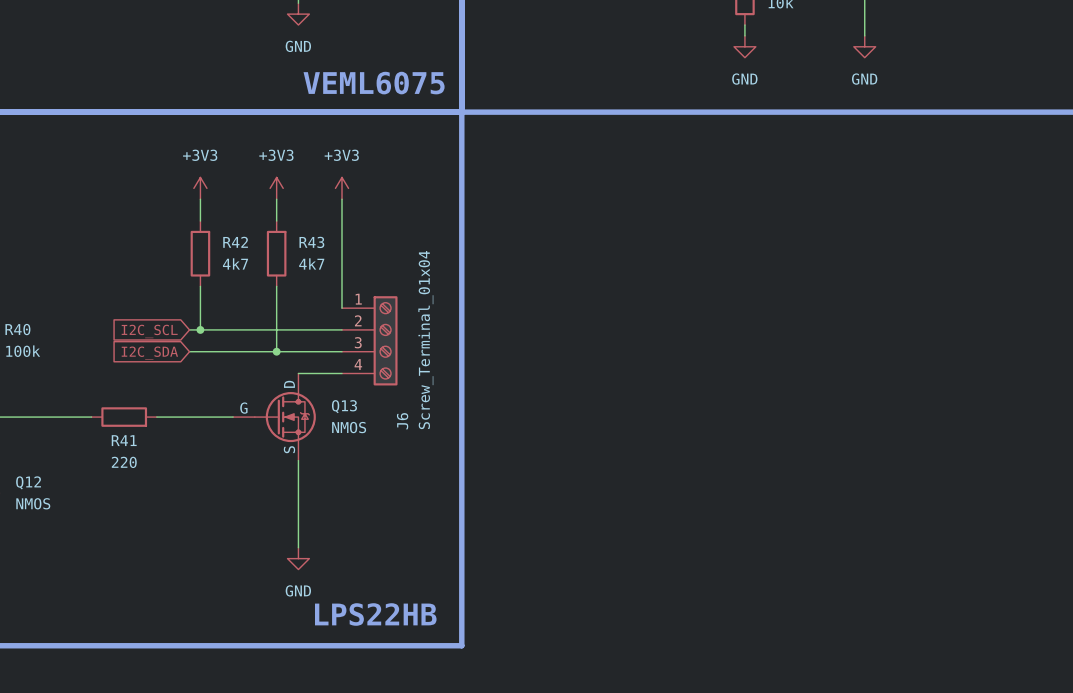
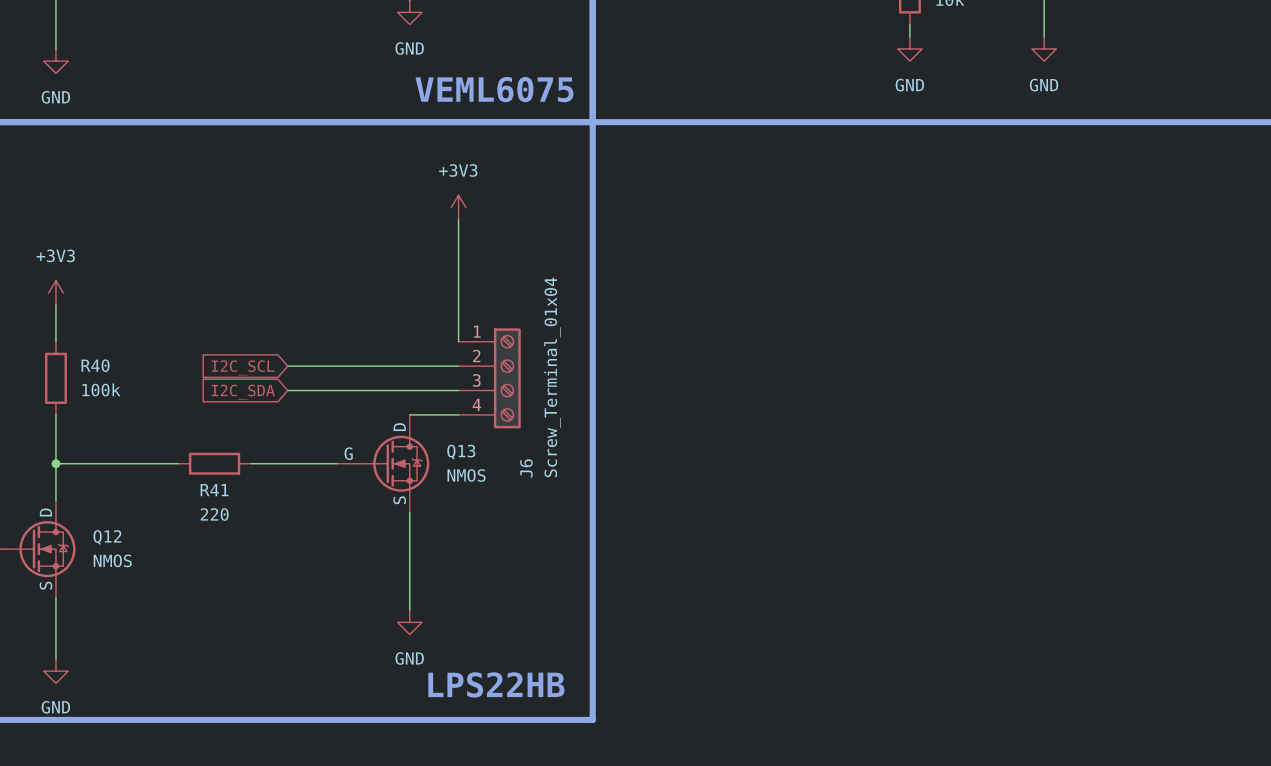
power symbol: +3V3 (200, 188) -> none
power symbol: +3V3 (276, 188) -> none
wire: (200, 199) (200, 221) -> none
wire: (276, 199) (276, 221) -> none
R42: 4k7 (200, 253) -> none
R43: 4k7 (276, 253) -> none
wire: (200, 286) (200, 329) -> none
wire: (276, 286) (276, 351) -> none
junction: (200, 329) -> none
junction: (276, 351) -> none

